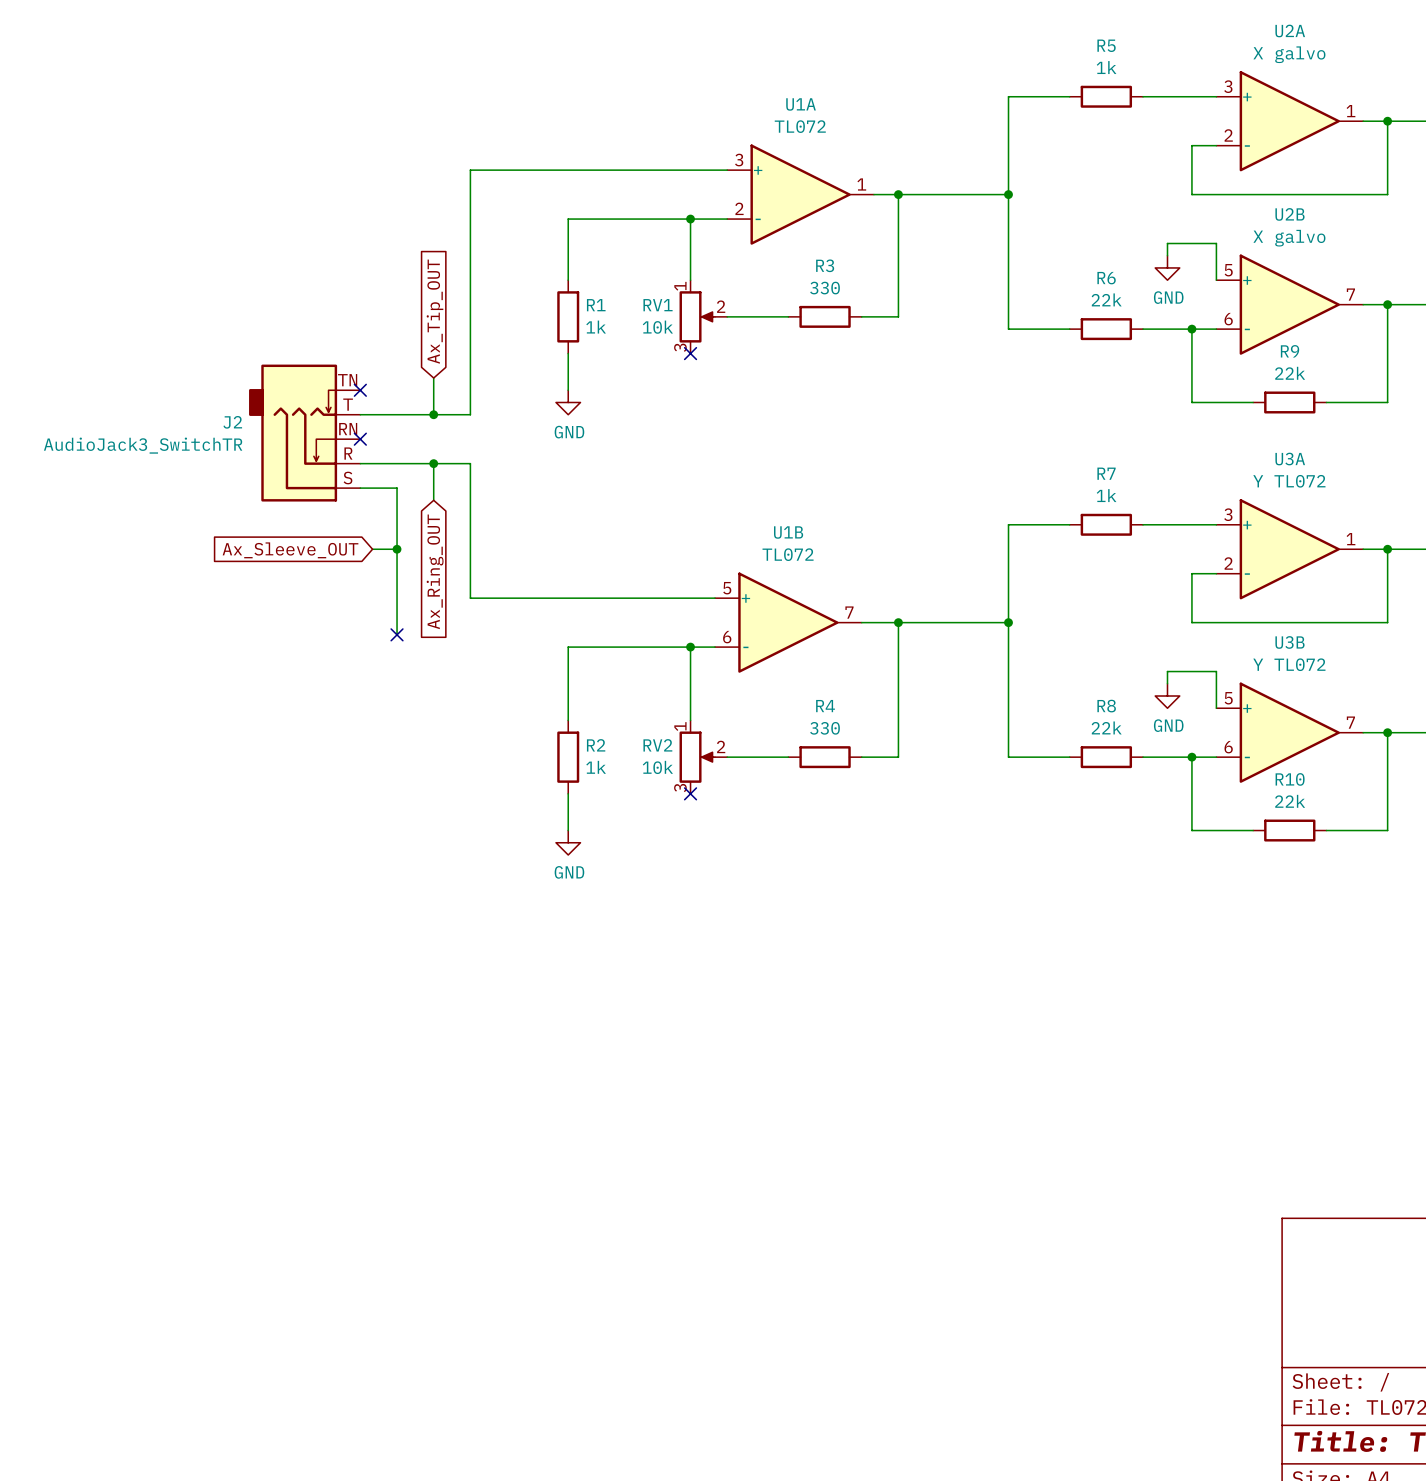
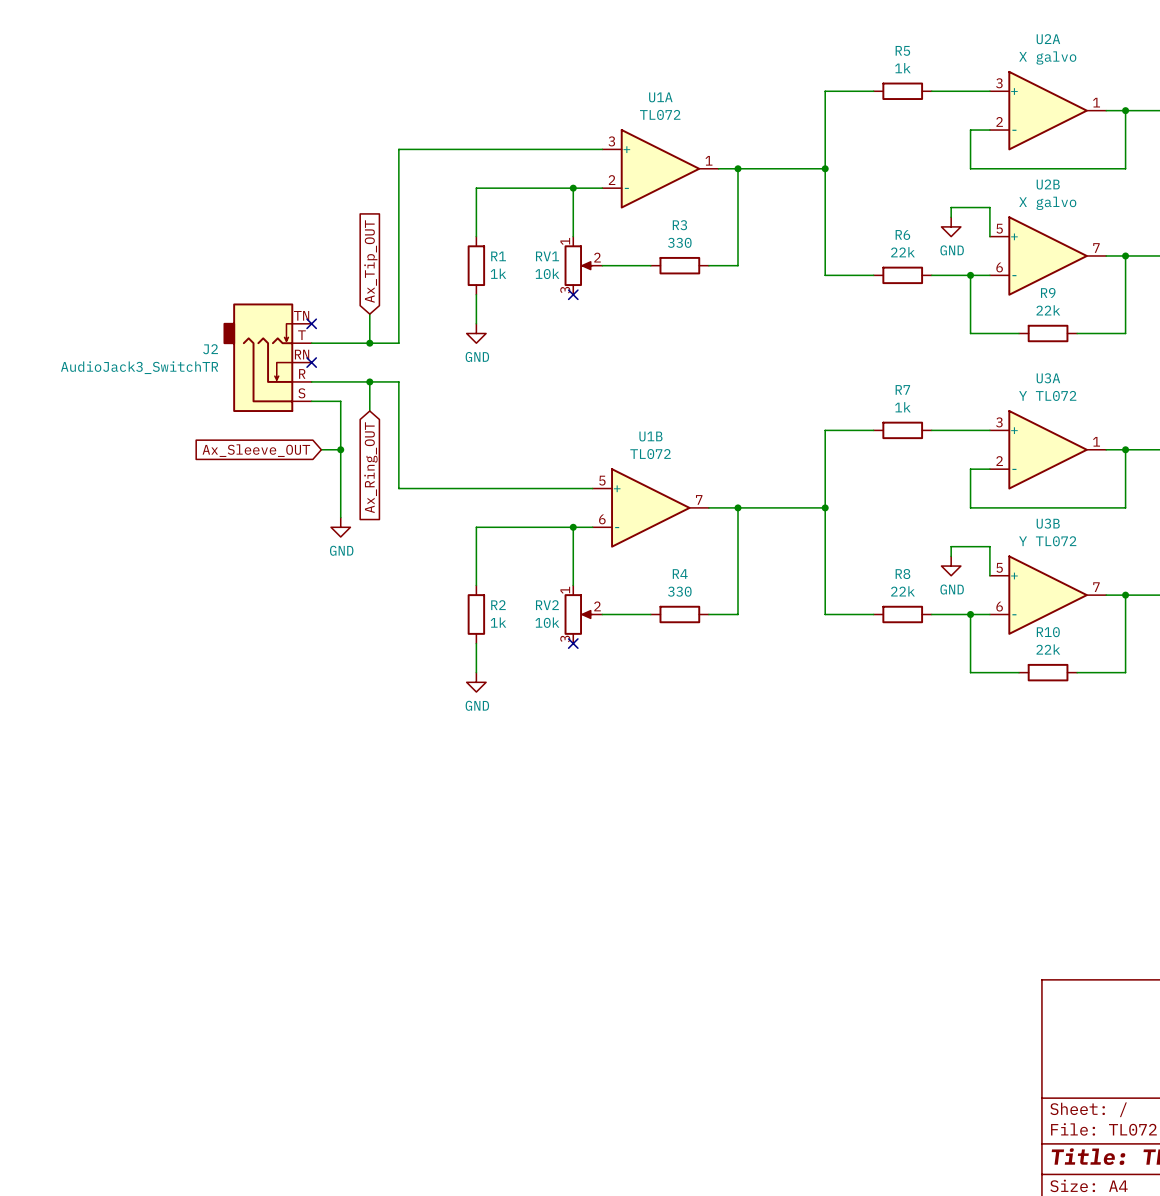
no-connect mark: (397, 634) -> none
power symbol: none -> GND (340, 527)

